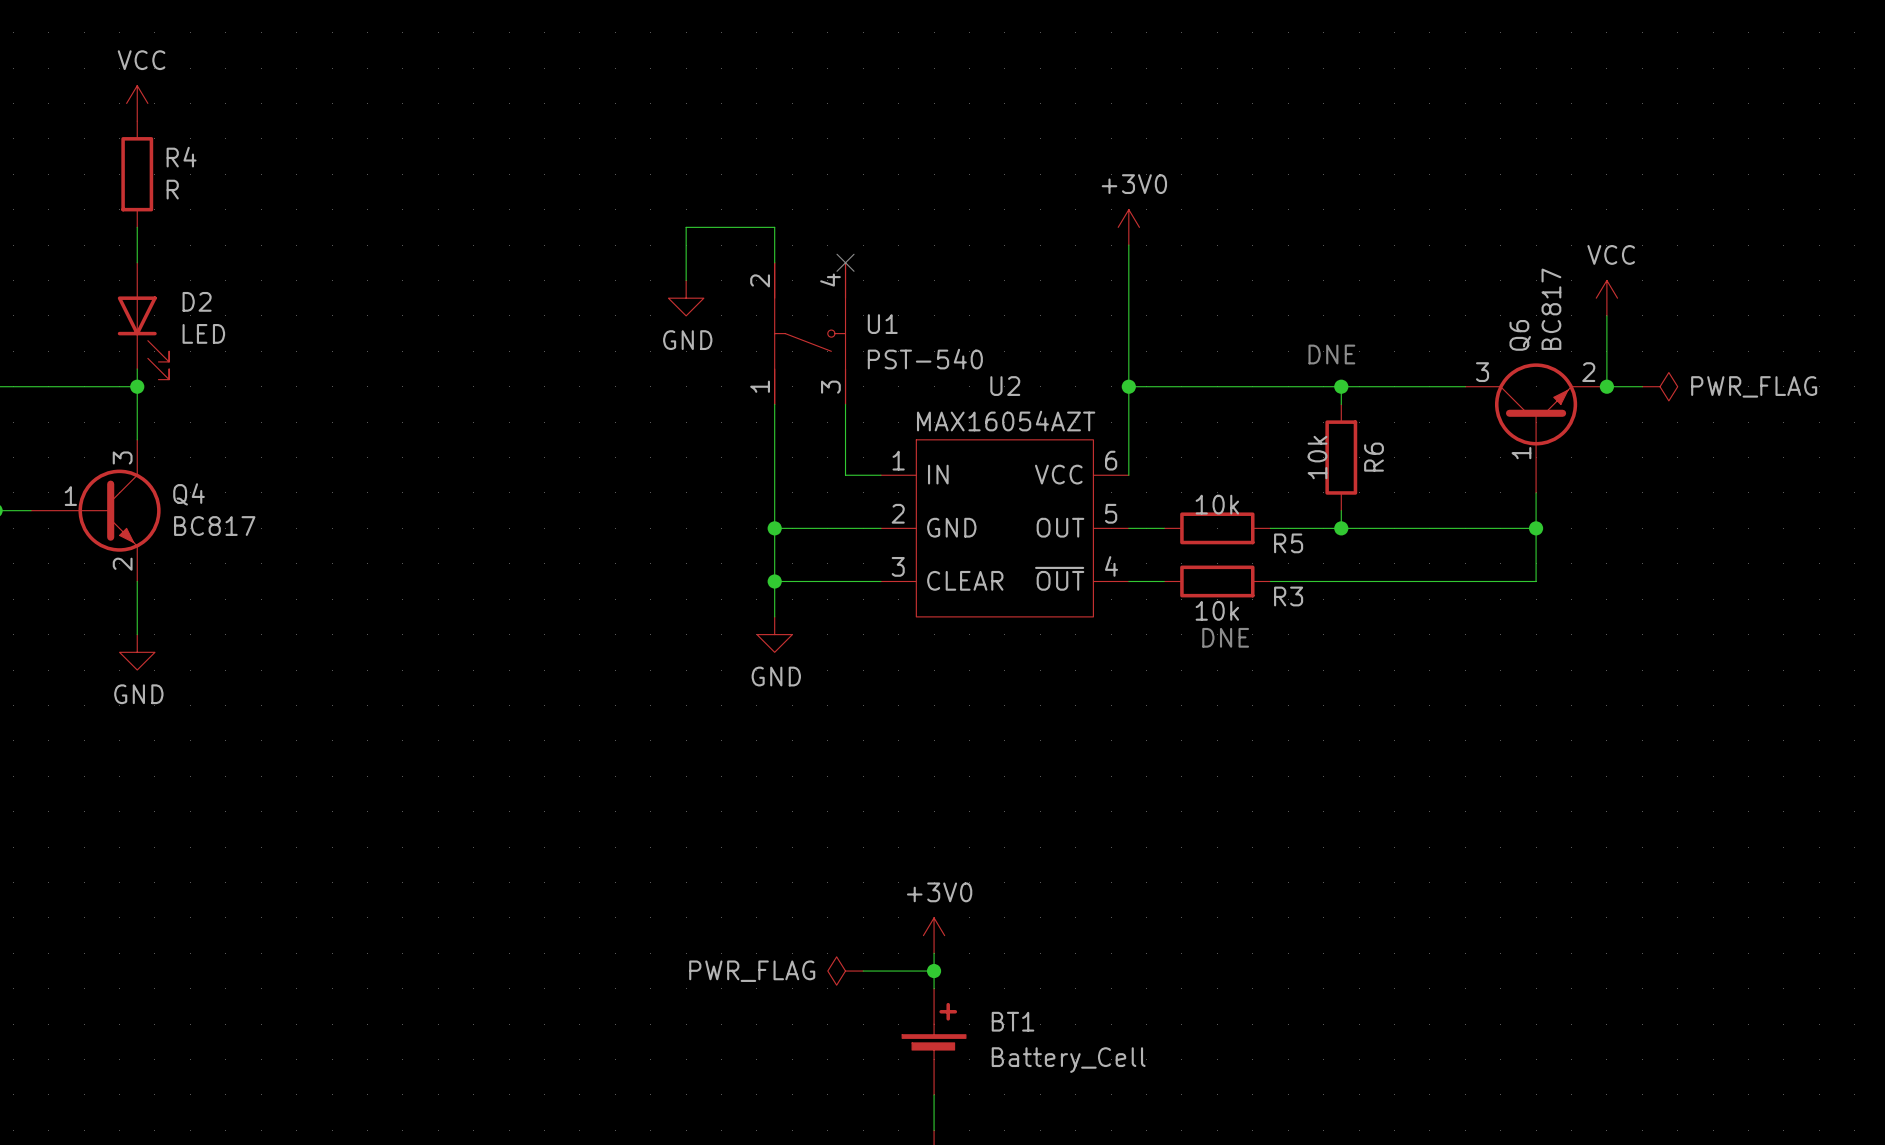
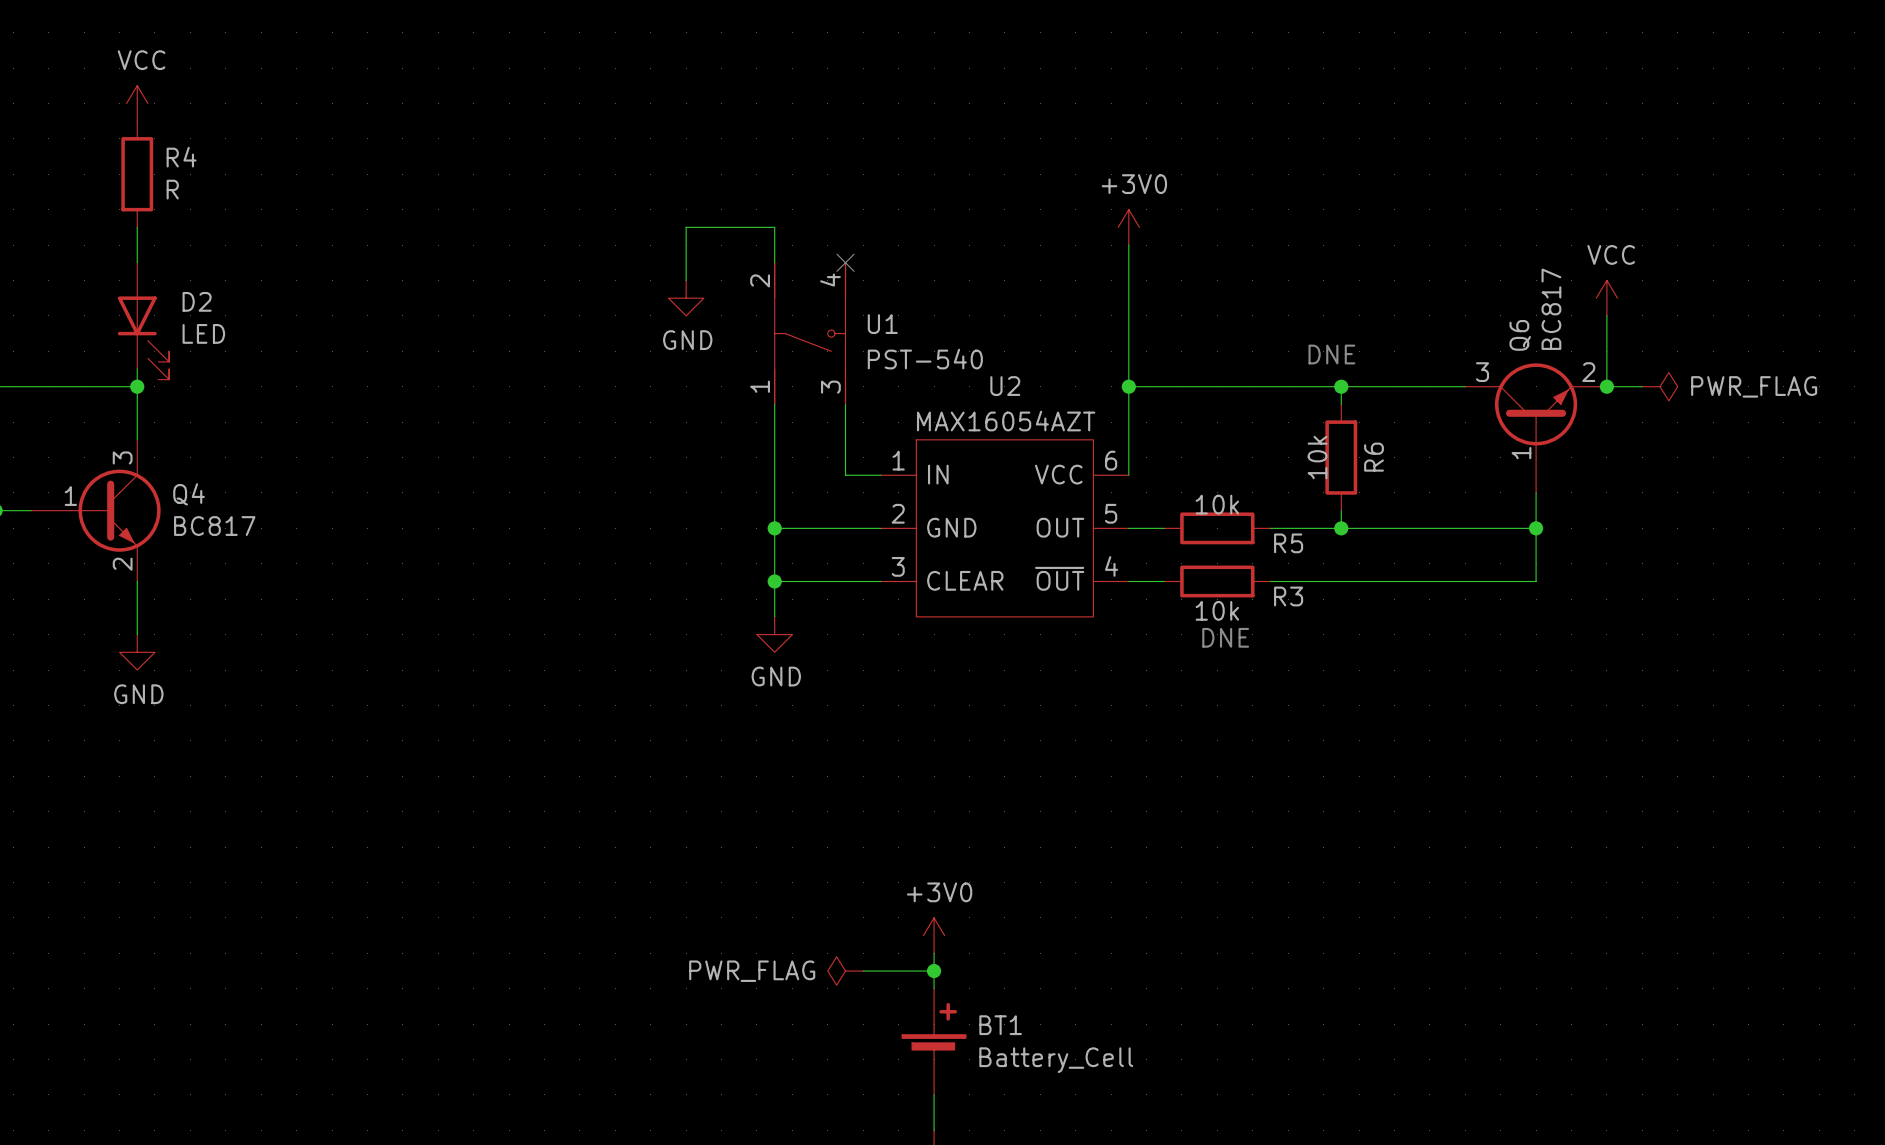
BT1 name position: BT1 (1013, 1021) -> BT1 (1000, 1025)
BT1 value position: Battery_Cell (1068, 1060) -> Battery_Cell (1056, 1060)

